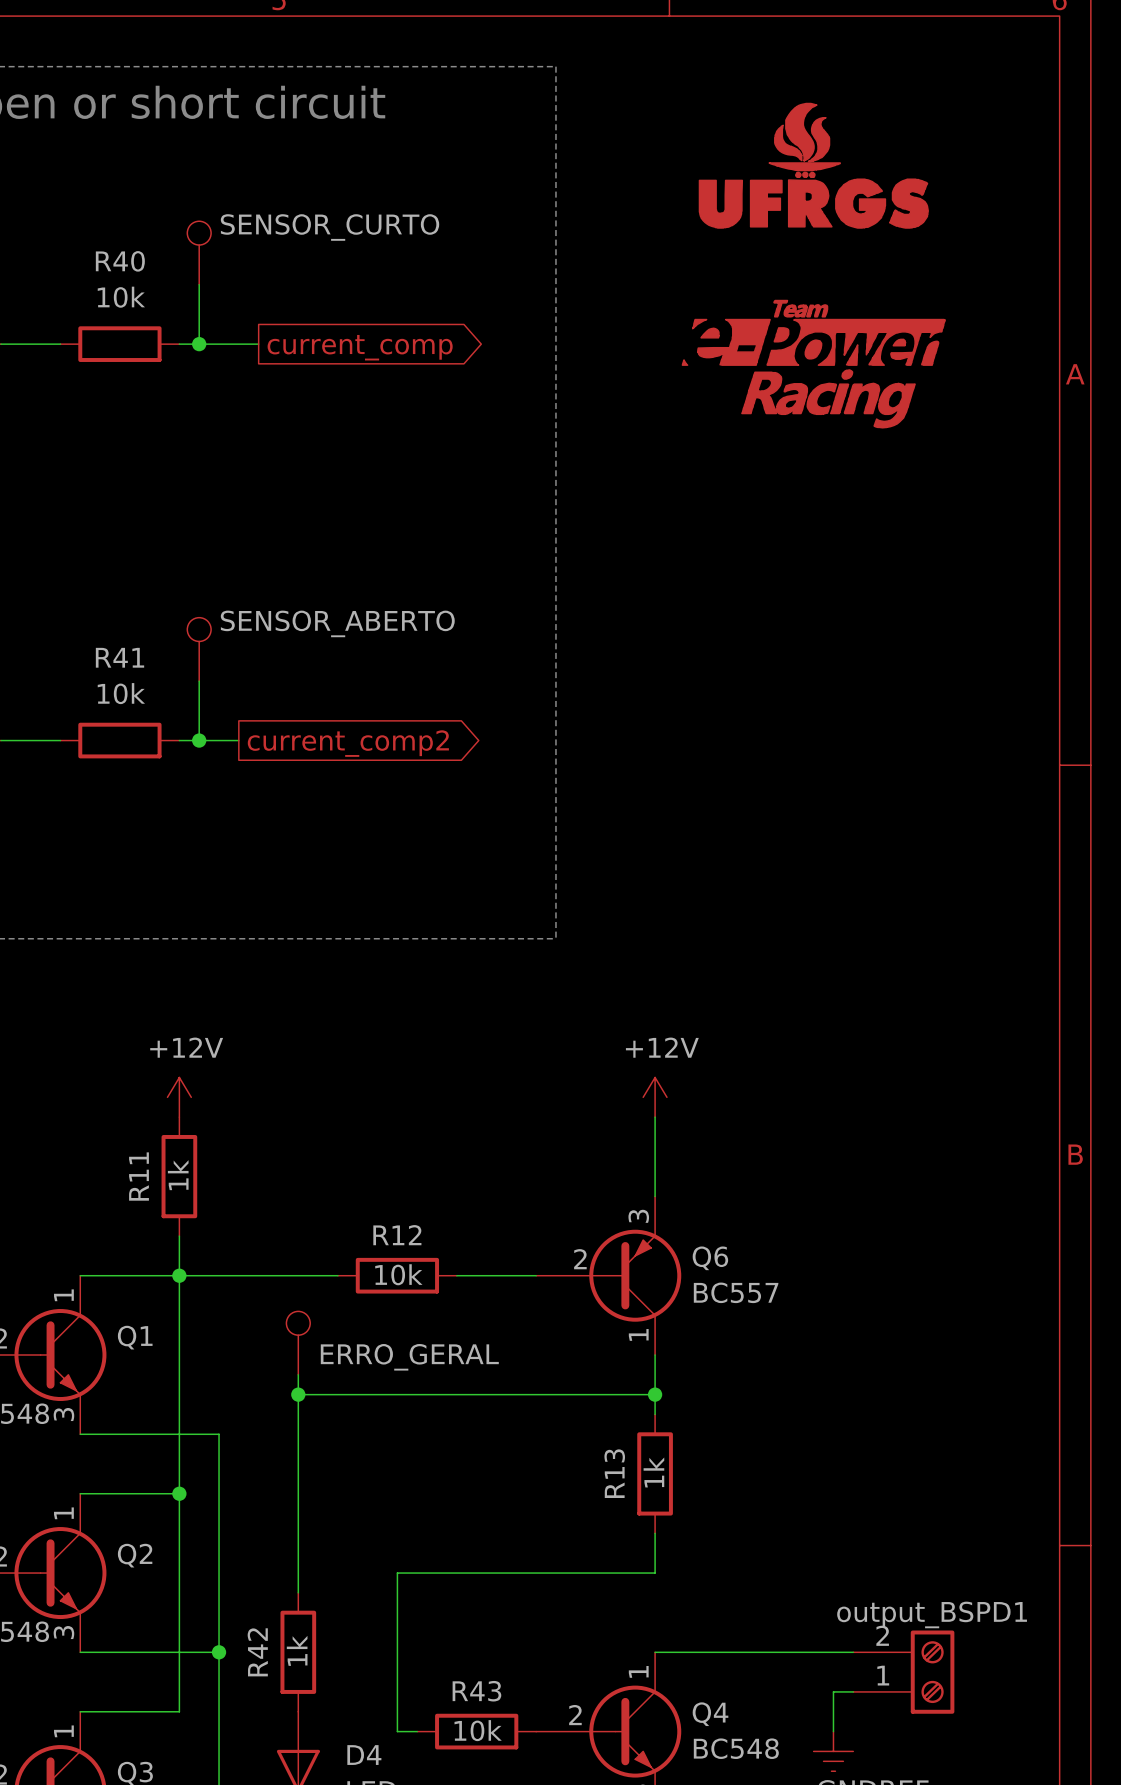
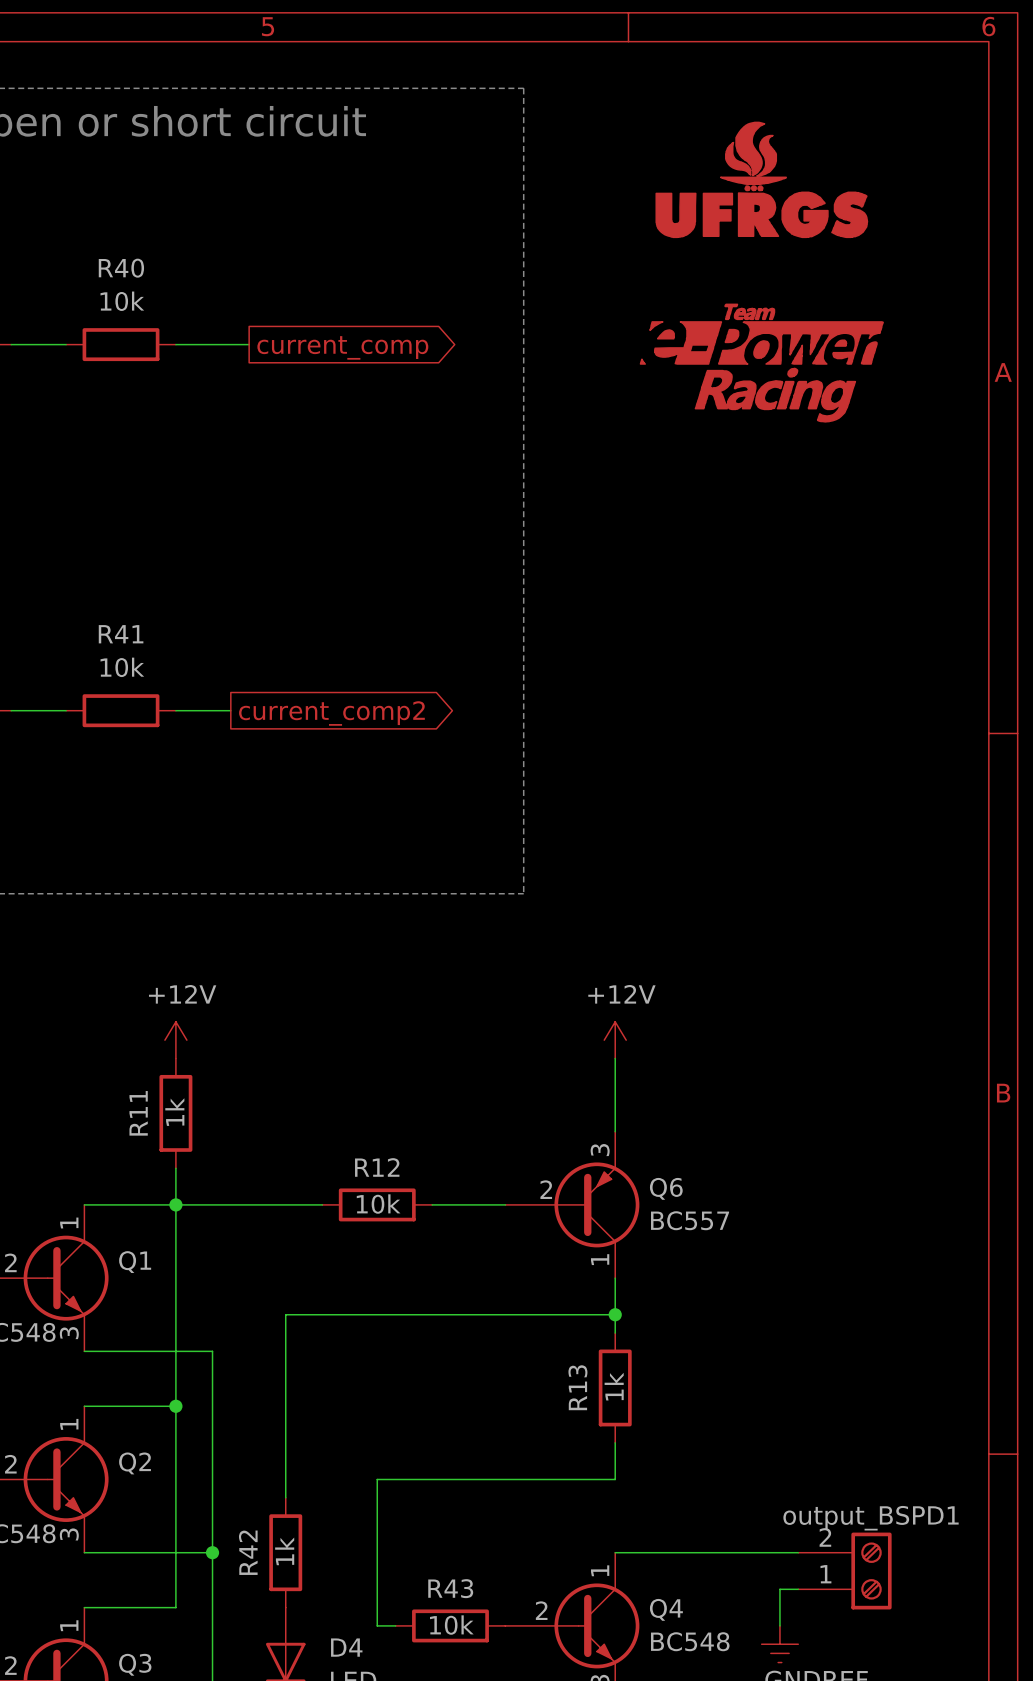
part: SENSOR_CURTO (199, 252) -> none
wire: (199, 284) (199, 344) -> none
junction: (199, 344) -> none
part: SENSOR_ABERTO (199, 649) -> none
wire: (199, 681) (199, 740) -> none
junction: (199, 740) -> none
part: ERRO_GERAL (298, 1343) -> none
wire: (298, 1374) (298, 1394) -> none
junction: (298, 1394) -> none

